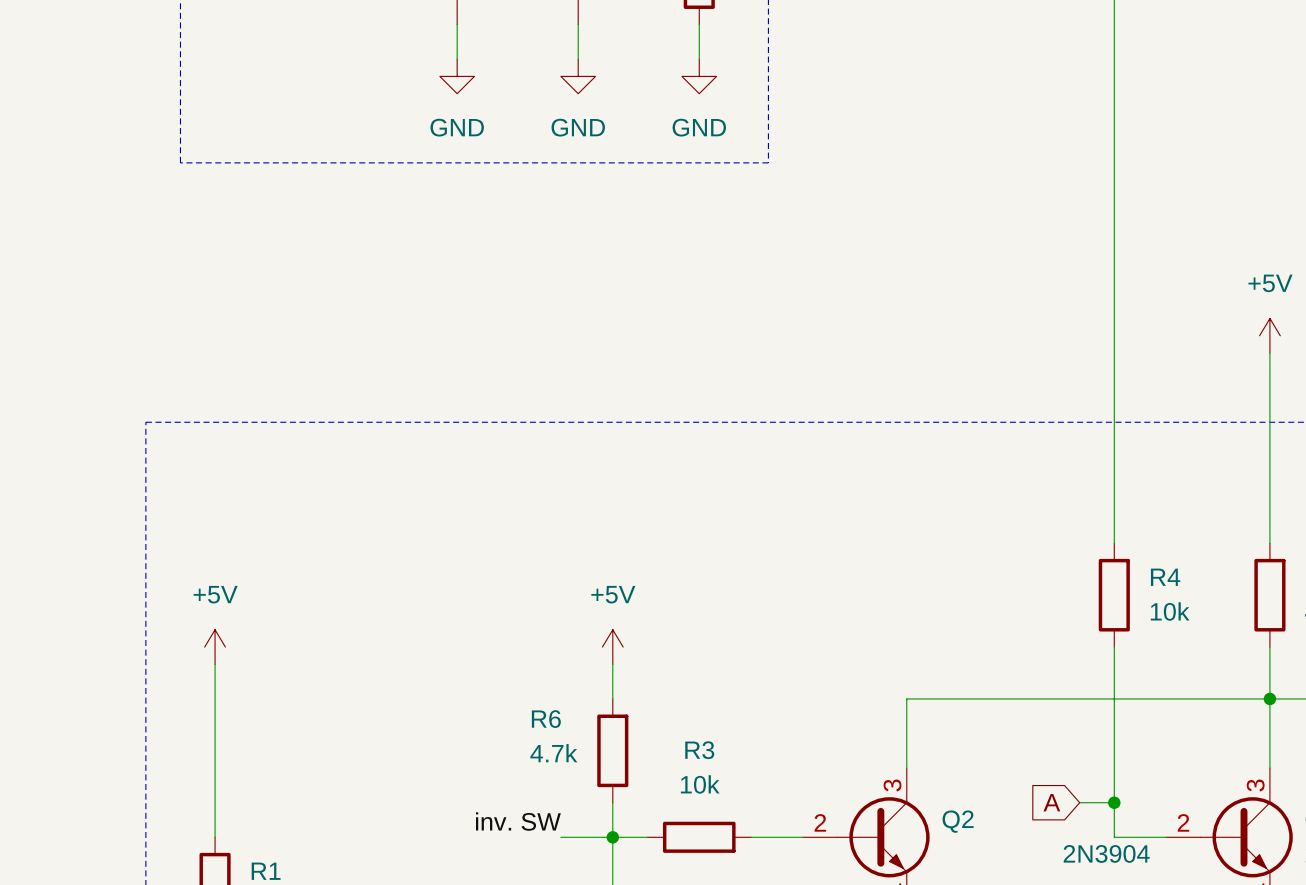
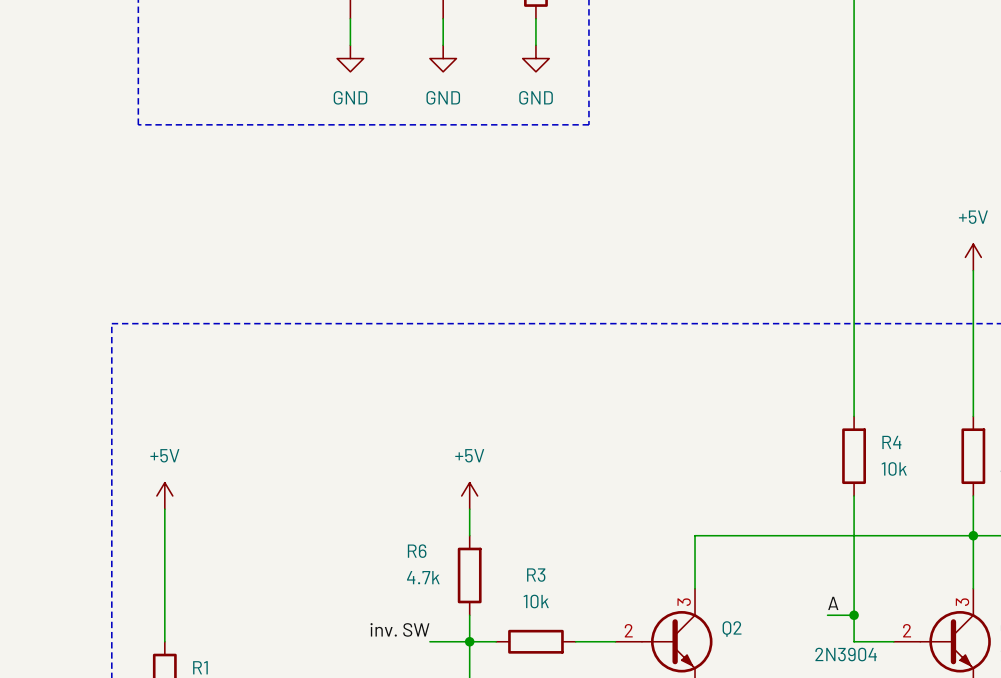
label: none -> A (833, 603)
global label: A (1051, 802) -> none

